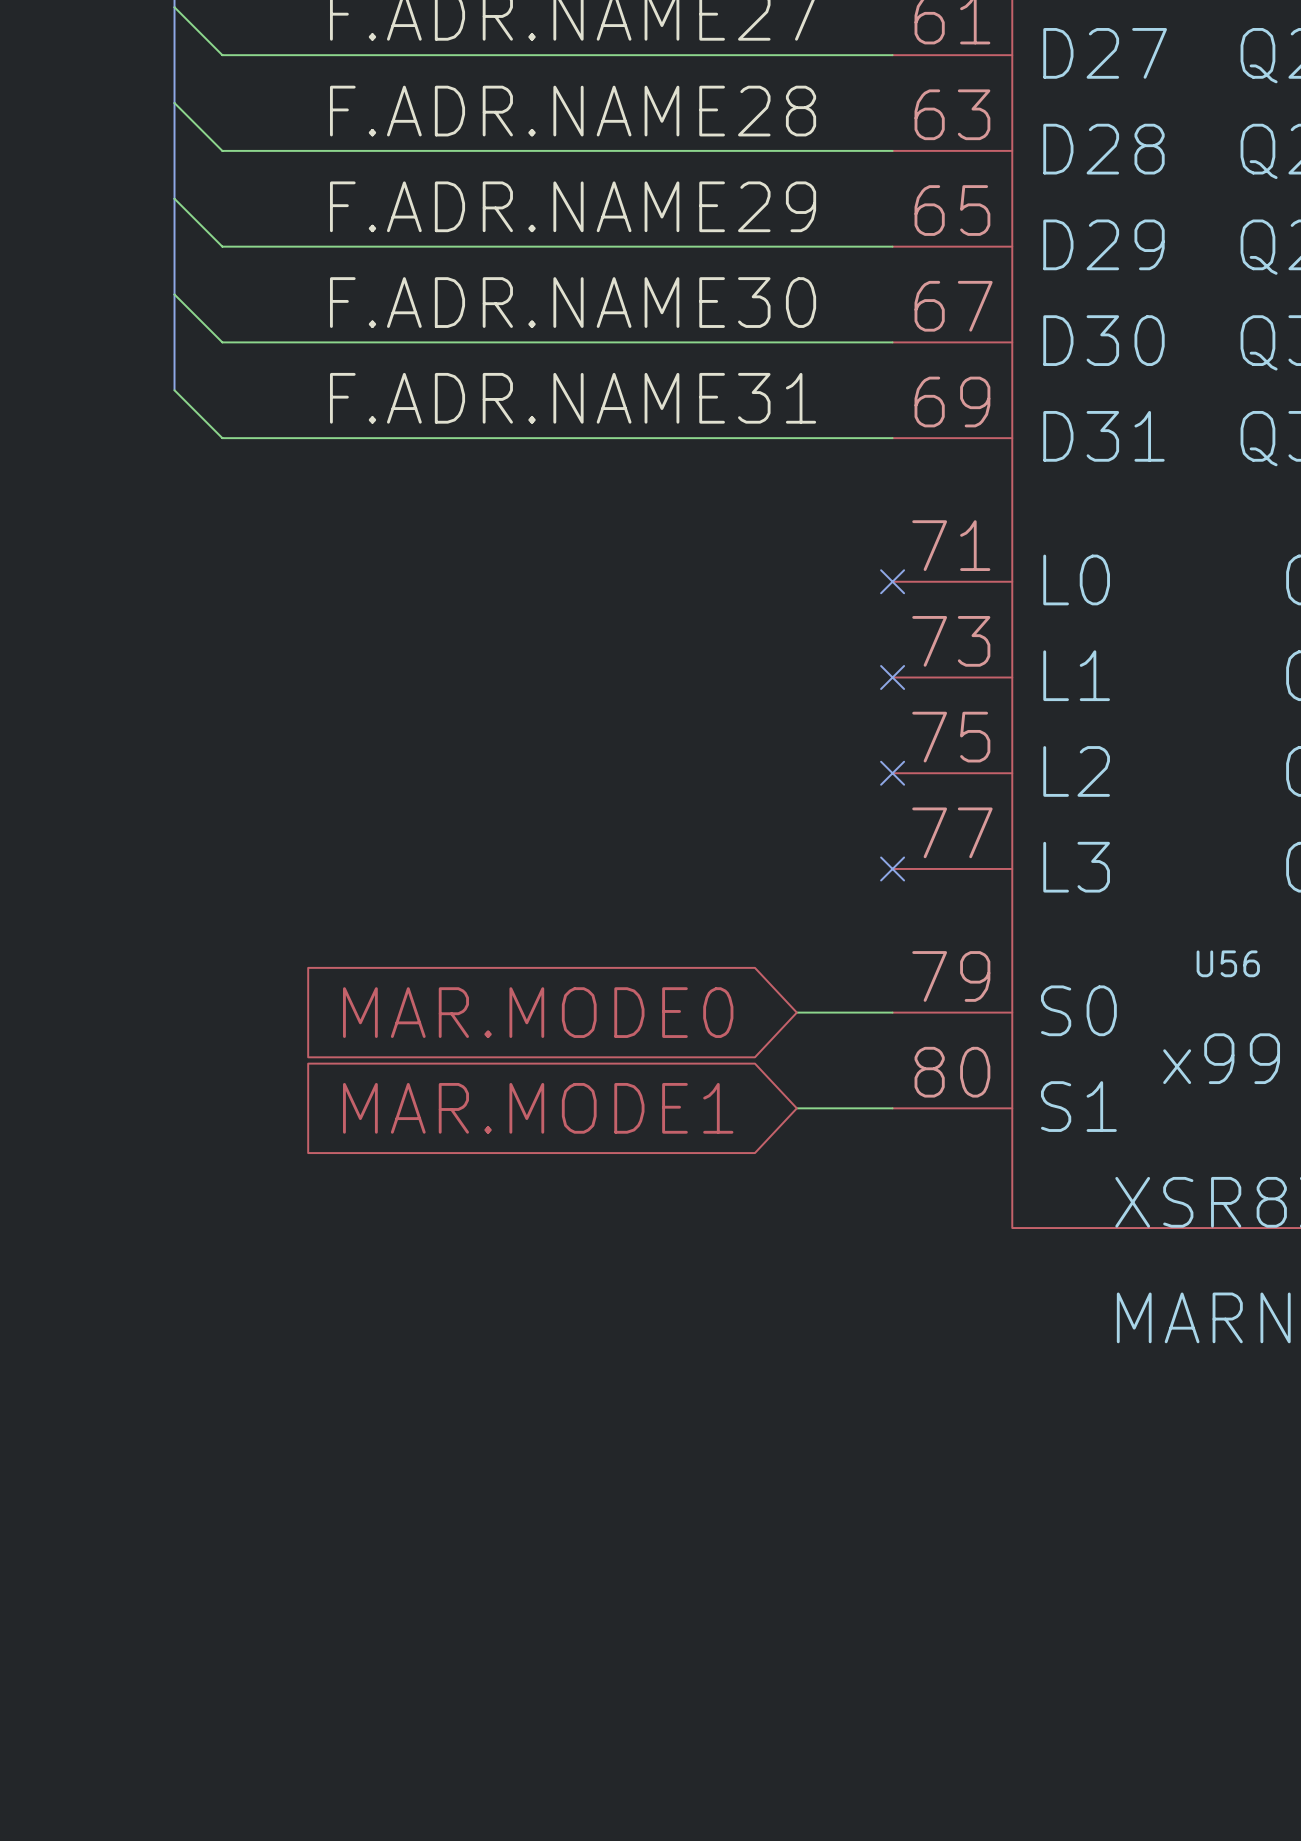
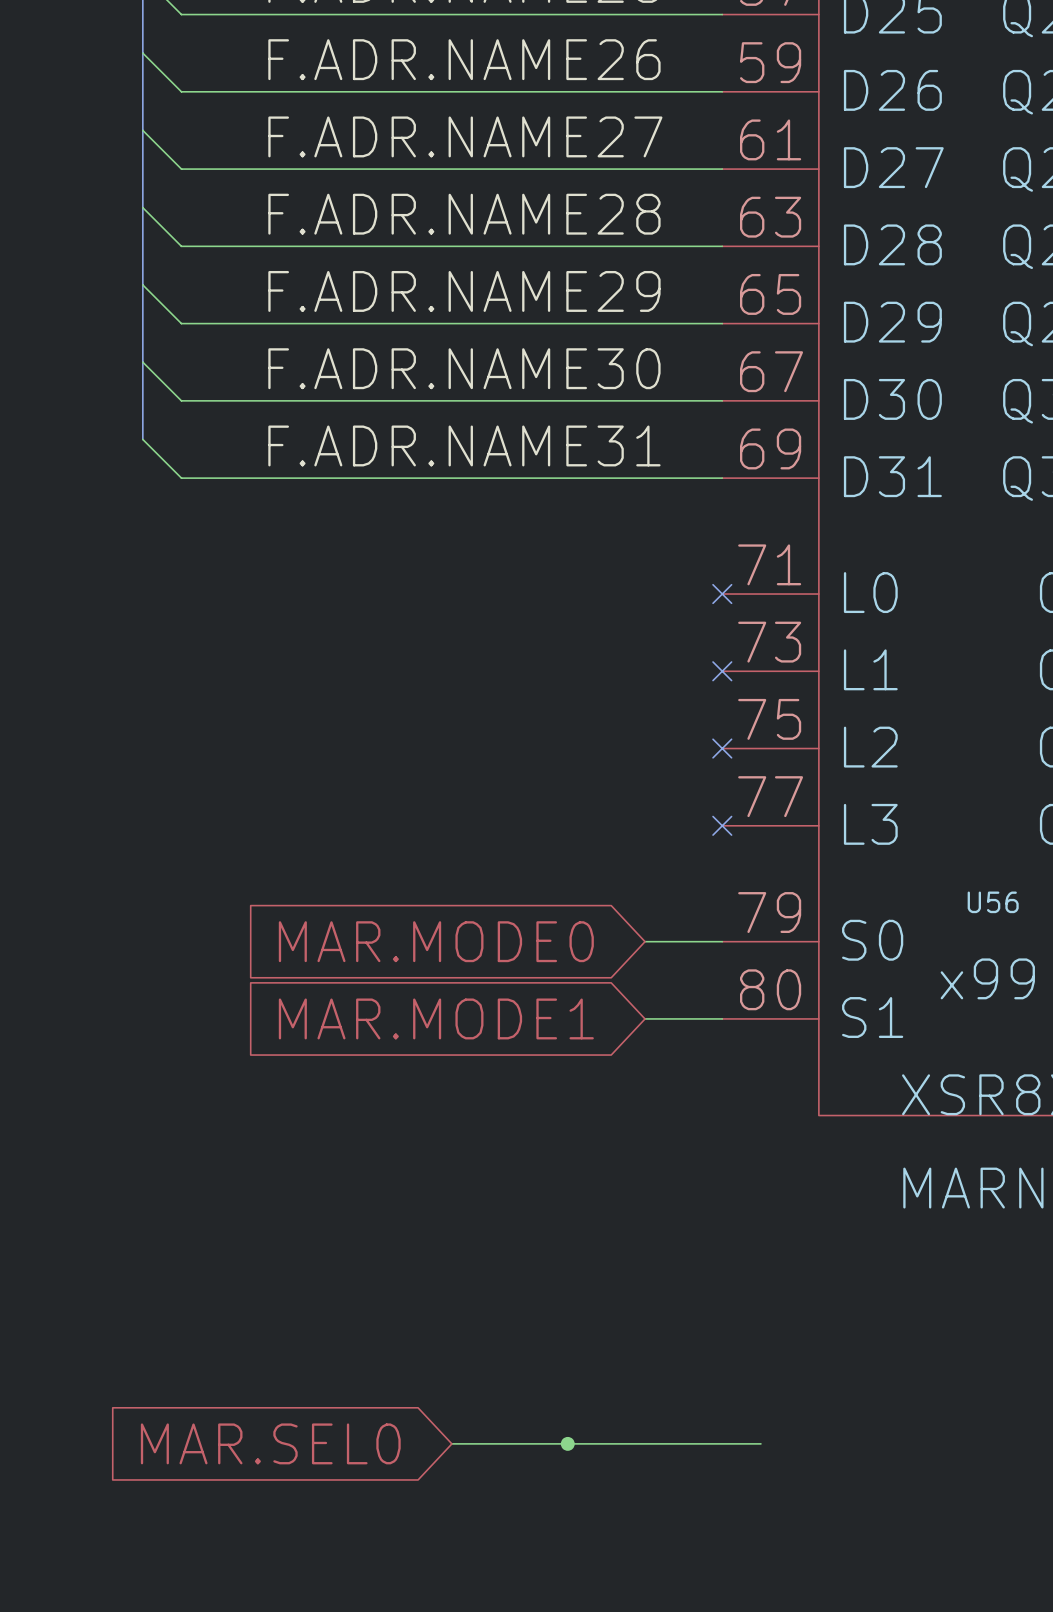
global label: none -> MAR.SEL0 (270, 1443)
wire: none -> (451, 1443) (760, 1443)
junction: none -> (567, 1443)

